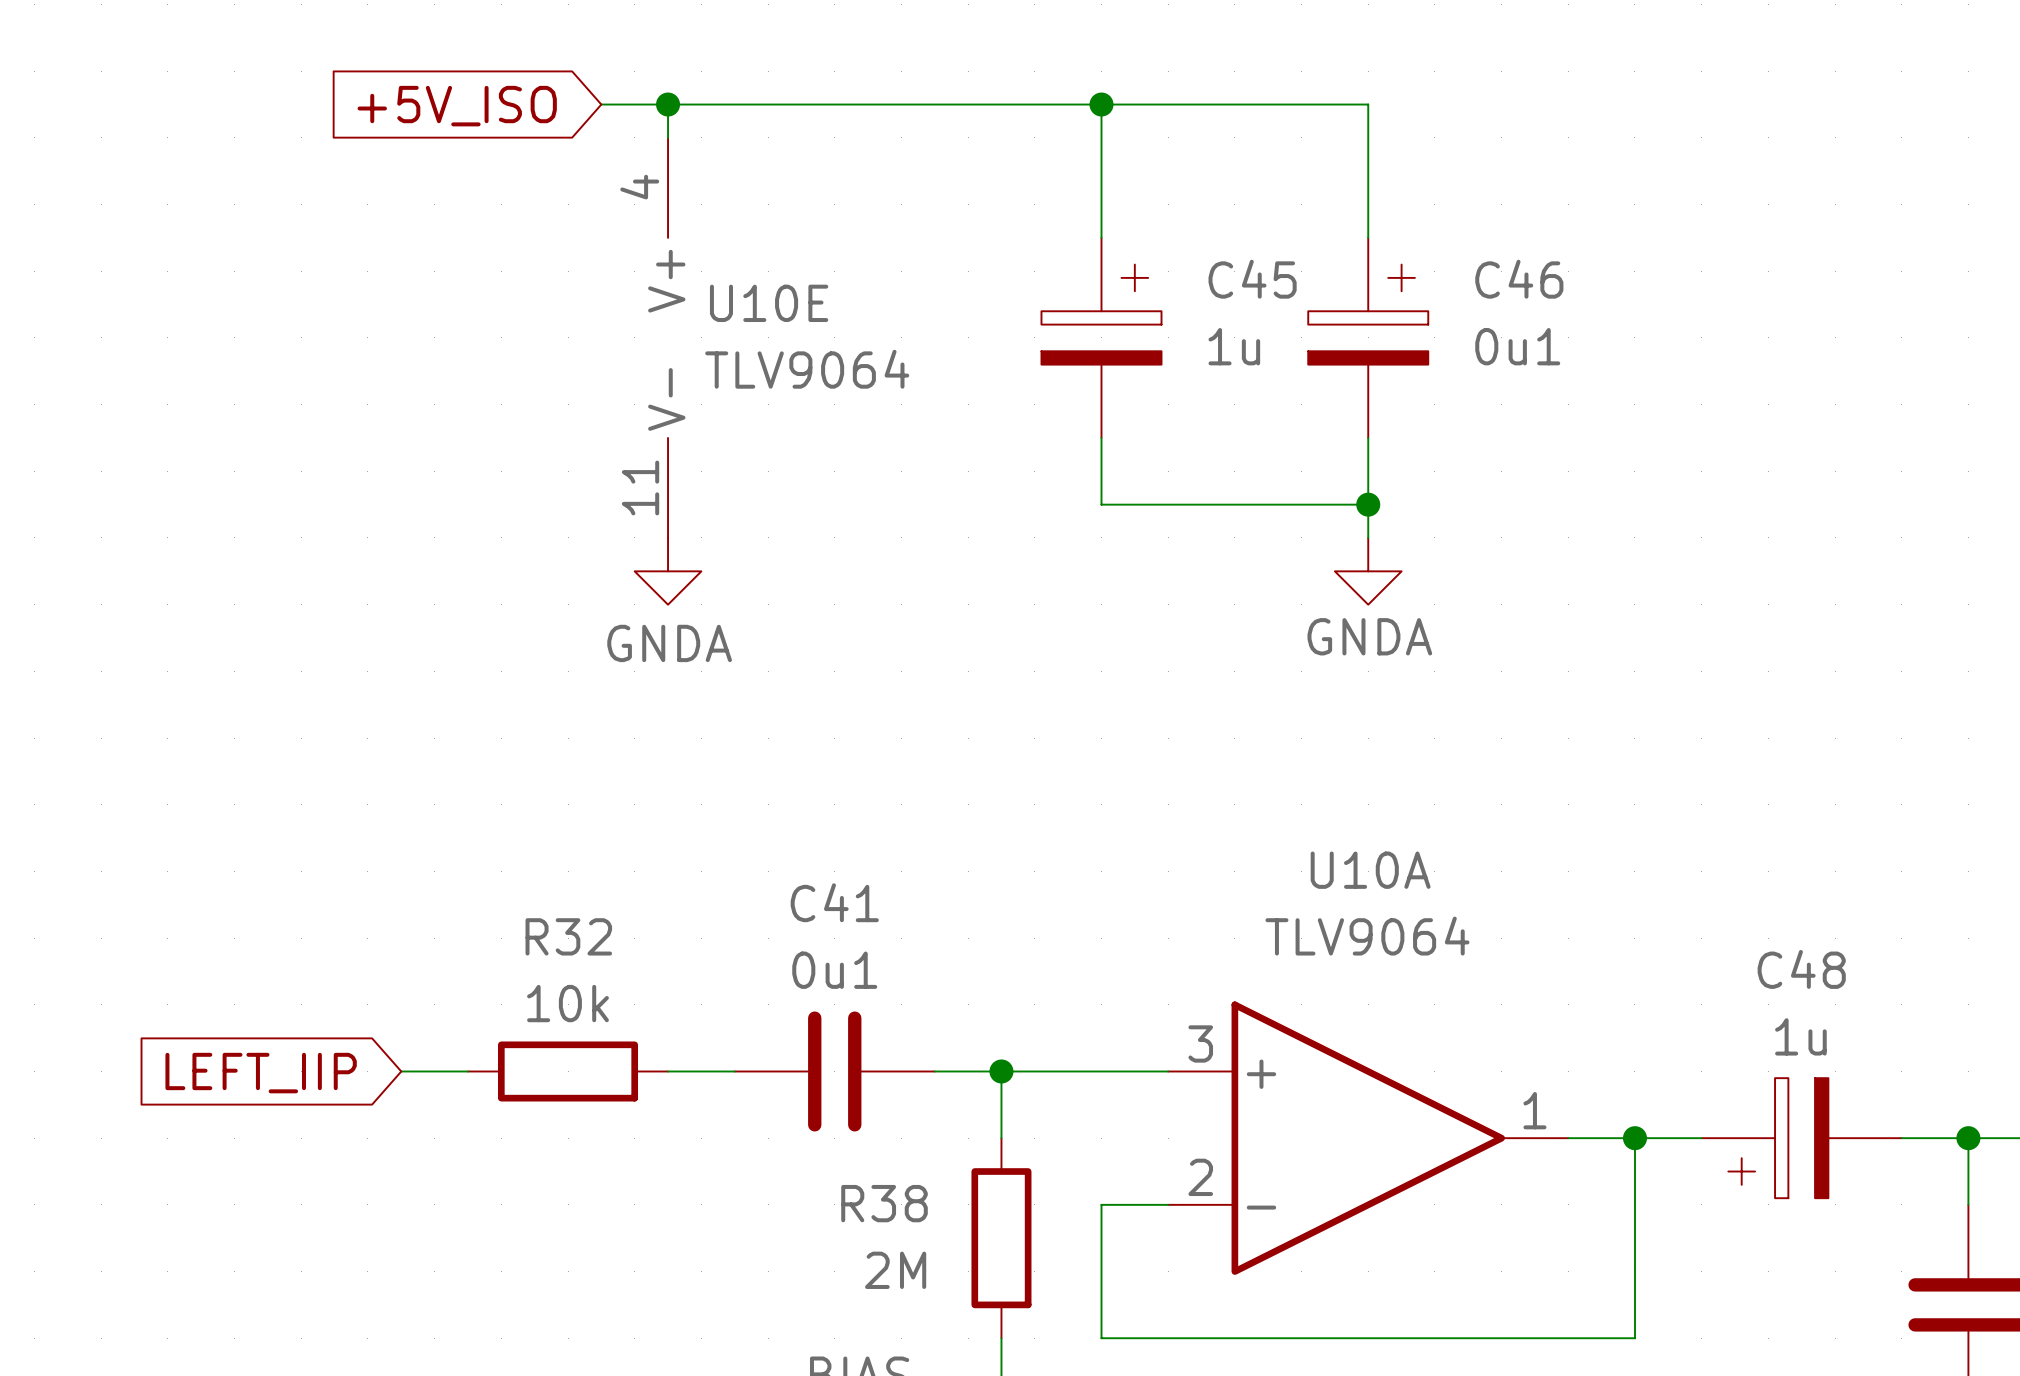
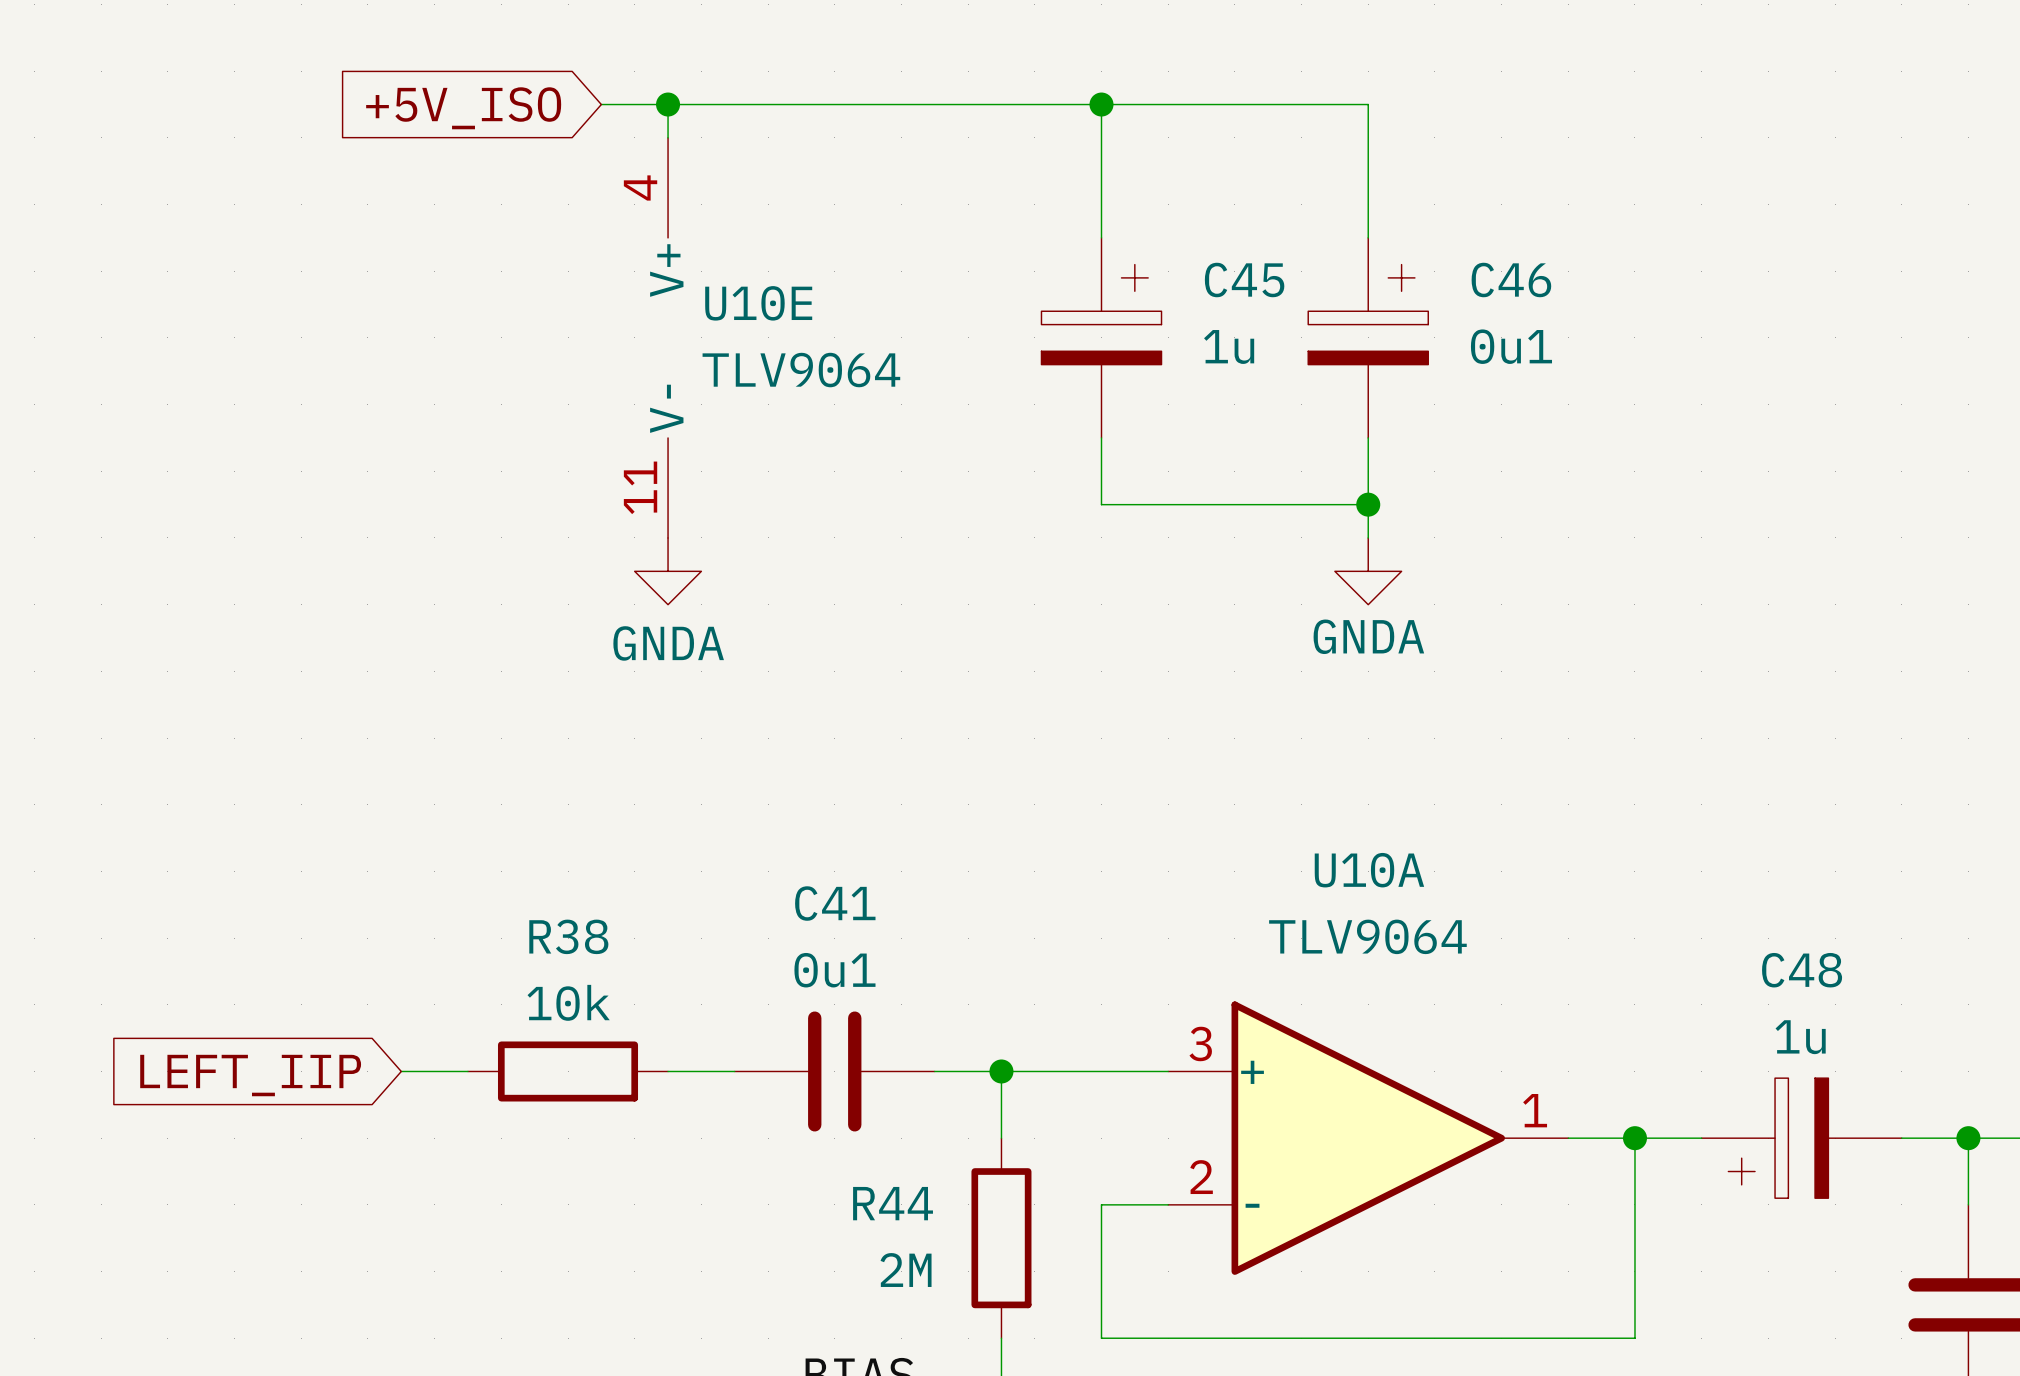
R32 name: R32 (568, 936) -> R38 (568, 936)
R38 name: R38 (884, 1203) -> R44 (893, 1203)

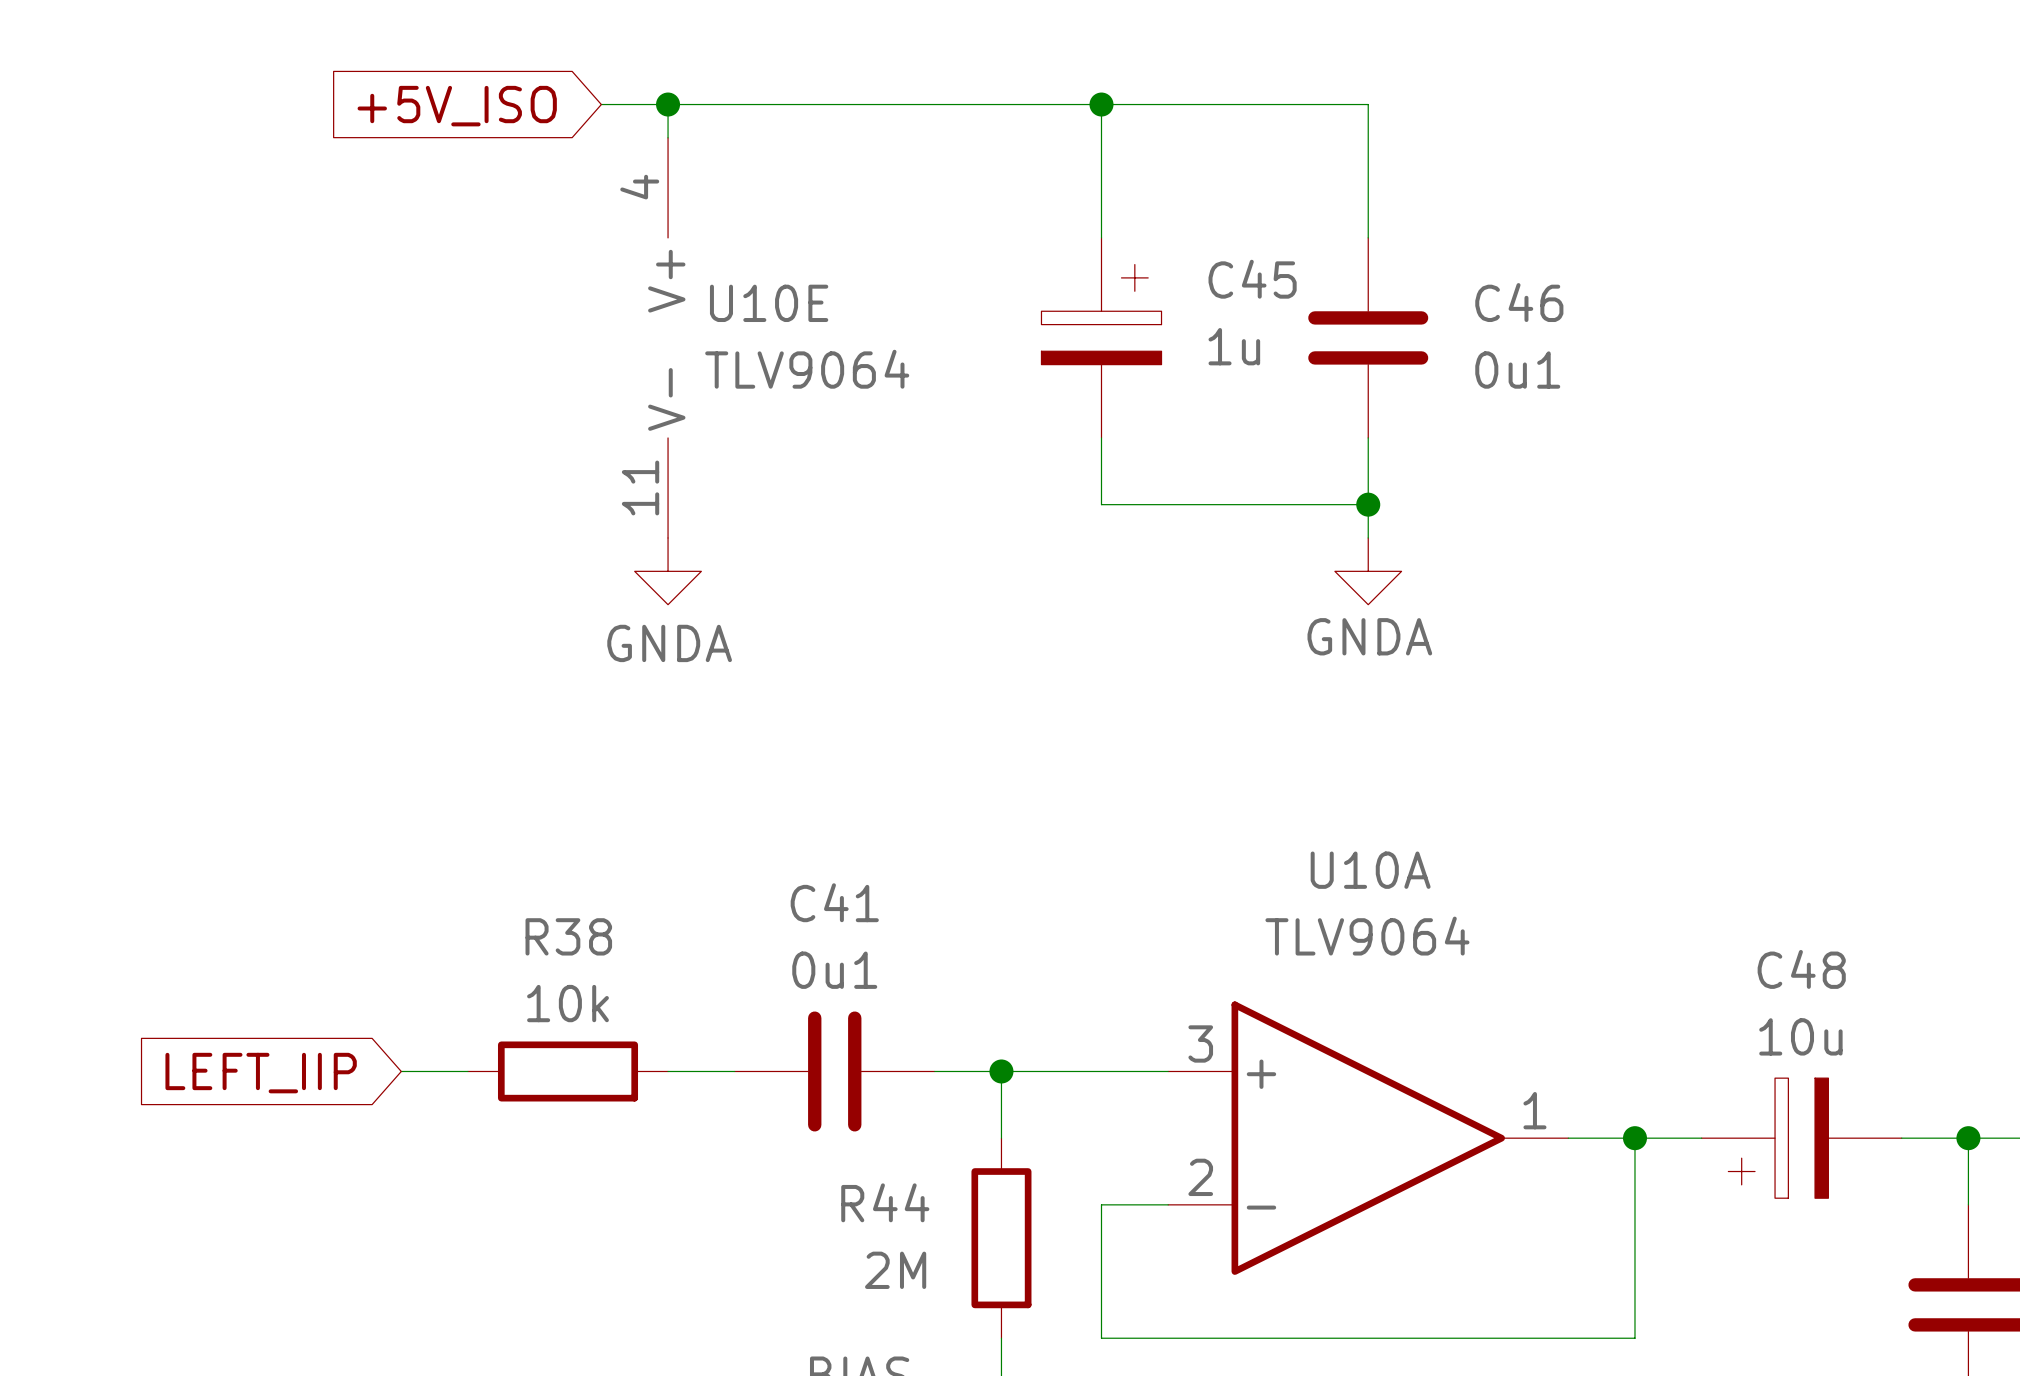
C46 symbol: [1308, 237, 1429, 438] -> [1308, 237, 1429, 438]
C48 value: 1u (1800, 1037) -> 10u (1800, 1036)

